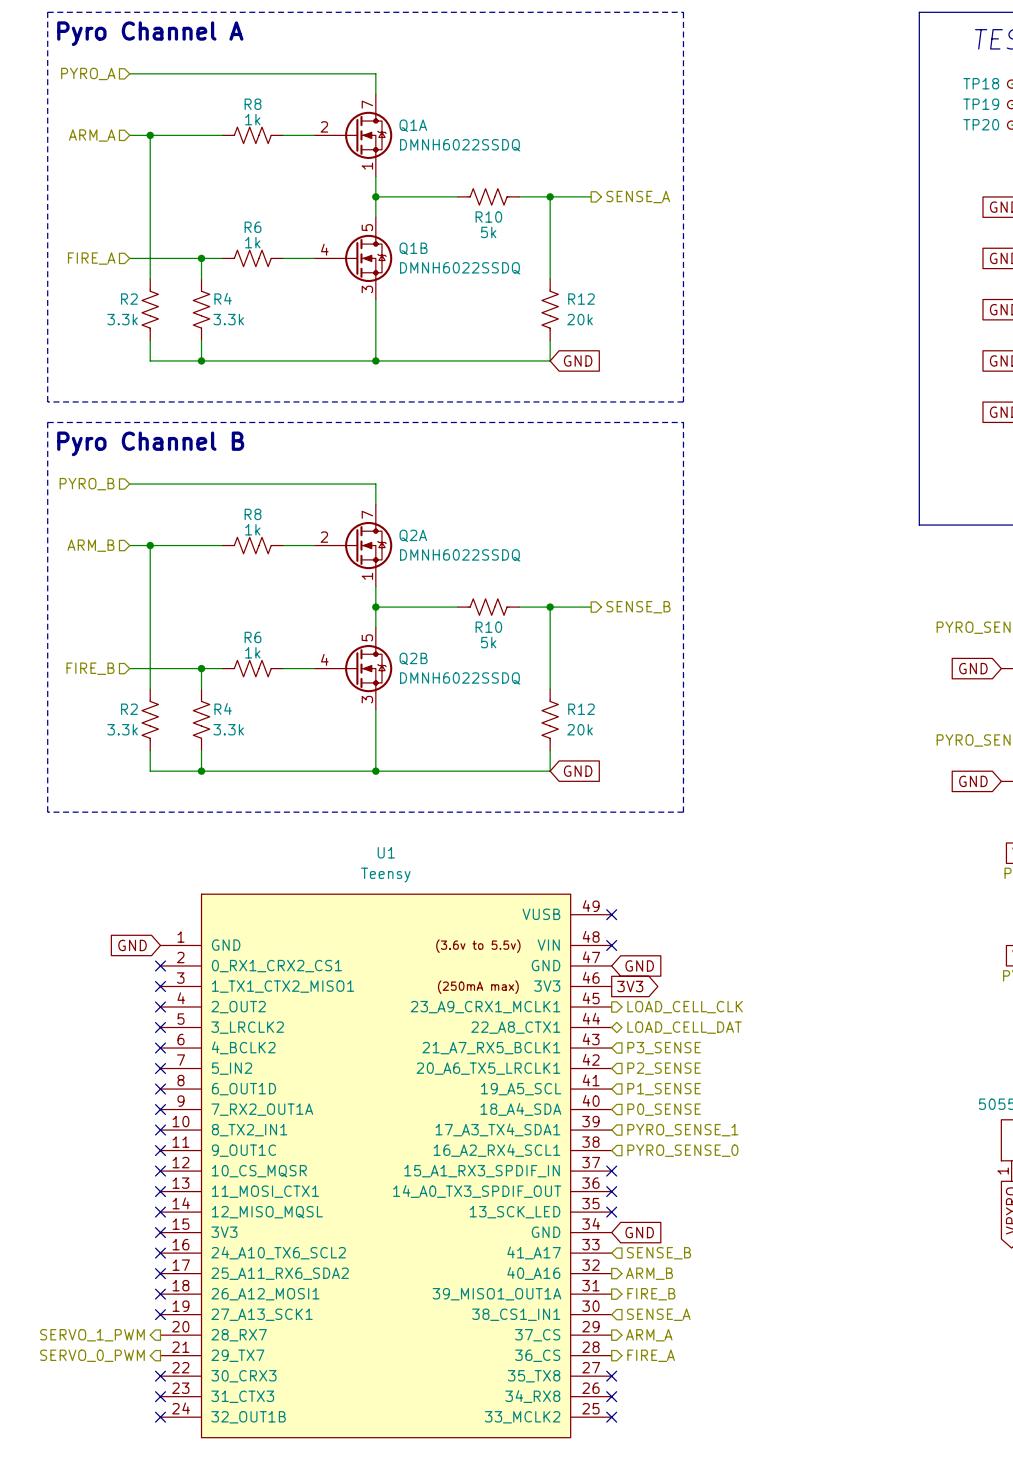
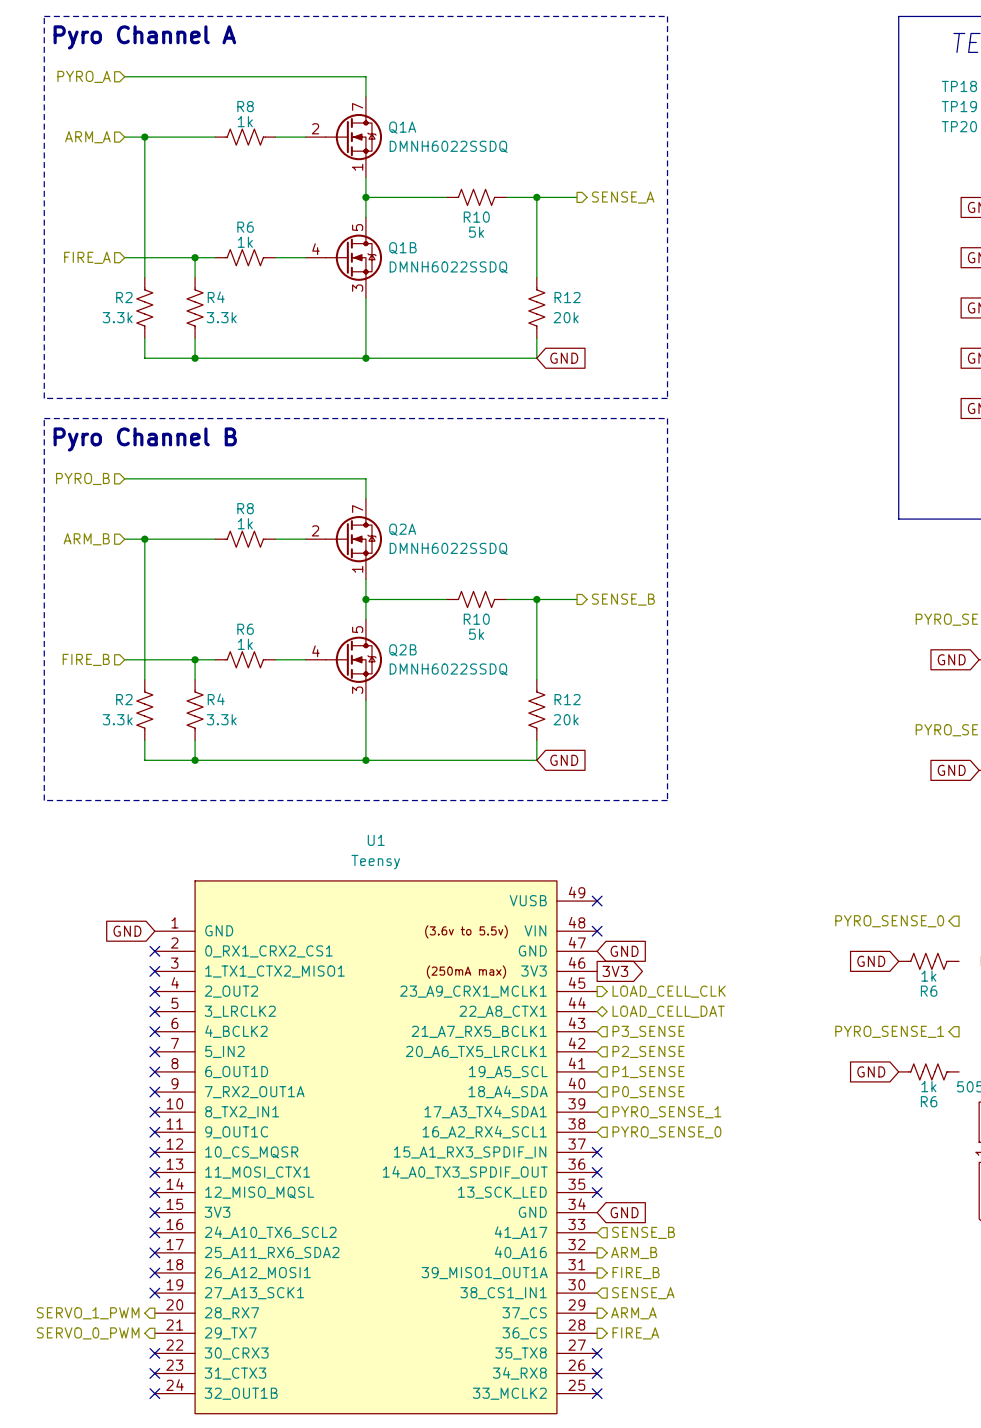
hierarchical label: none -> PYRO_SENSE_0 (889, 921)
global label: none -> GND (871, 961)
R6: none -> 1k (928, 961)
hierarchical label: none -> PYRO_SENSE_1 (889, 1031)
global label: none -> GND (871, 1071)
R6: none -> 1k (928, 1071)

